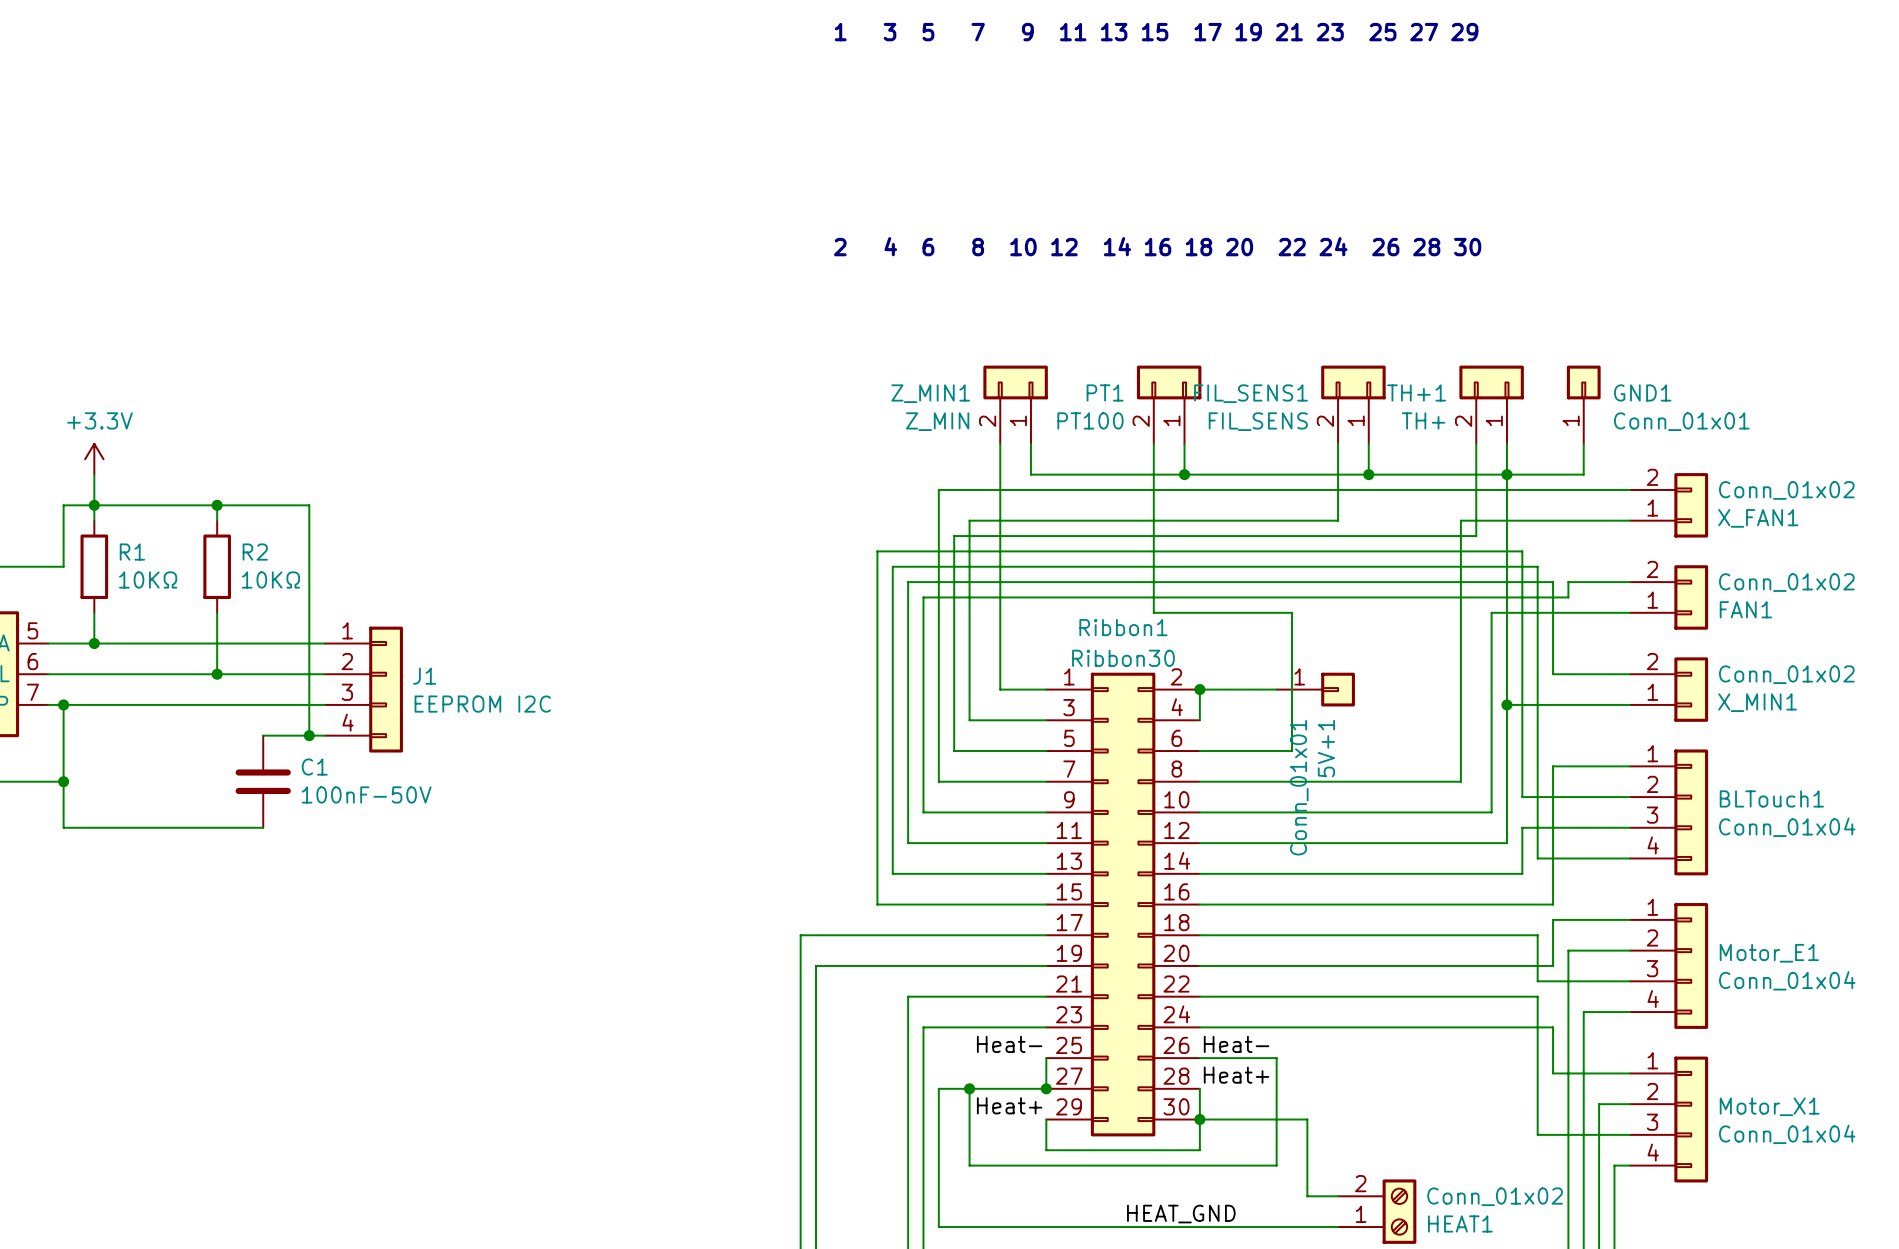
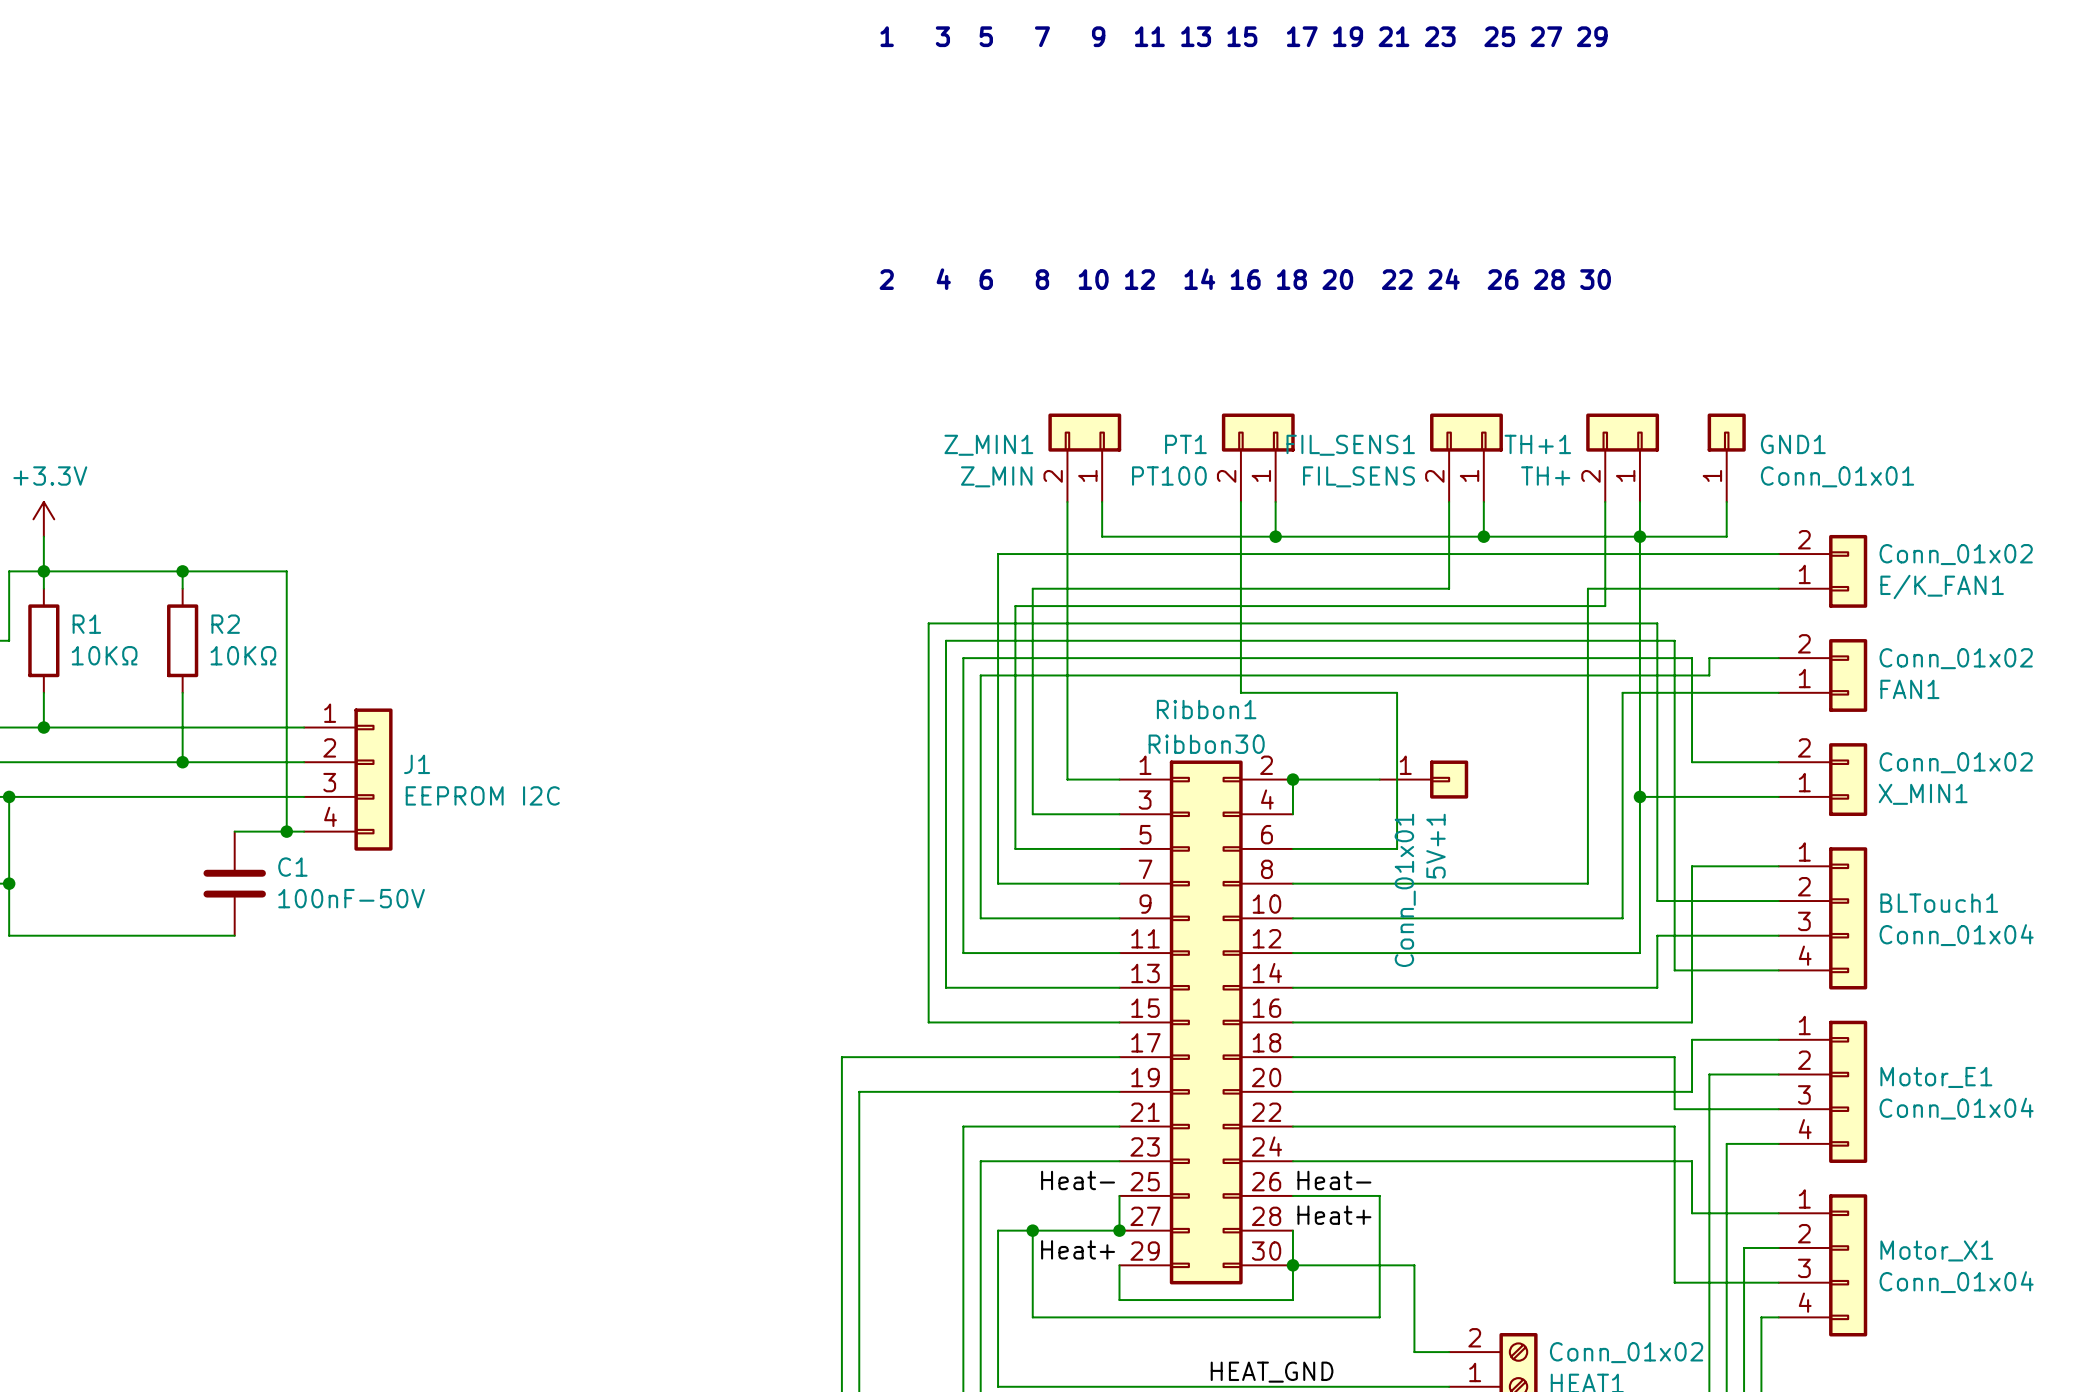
X_FAN1 name: X_FAN1 (1758, 518) -> E/K_FAN1 (1942, 586)

